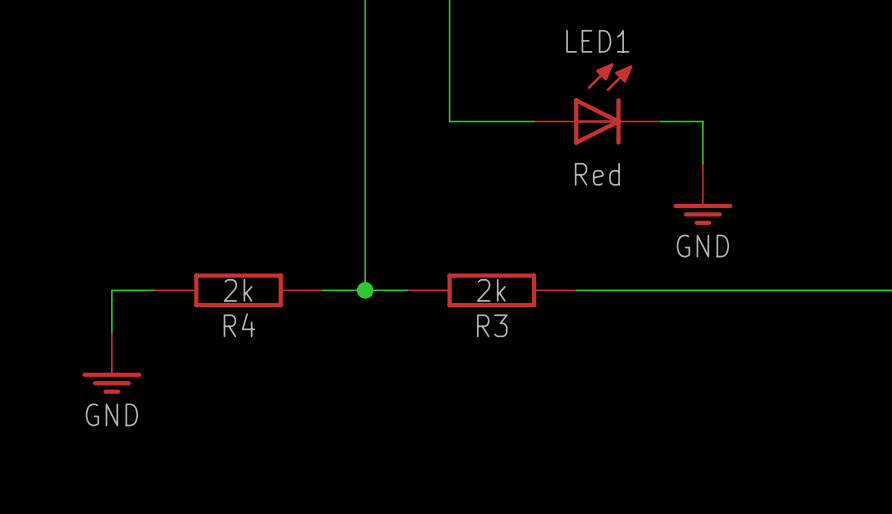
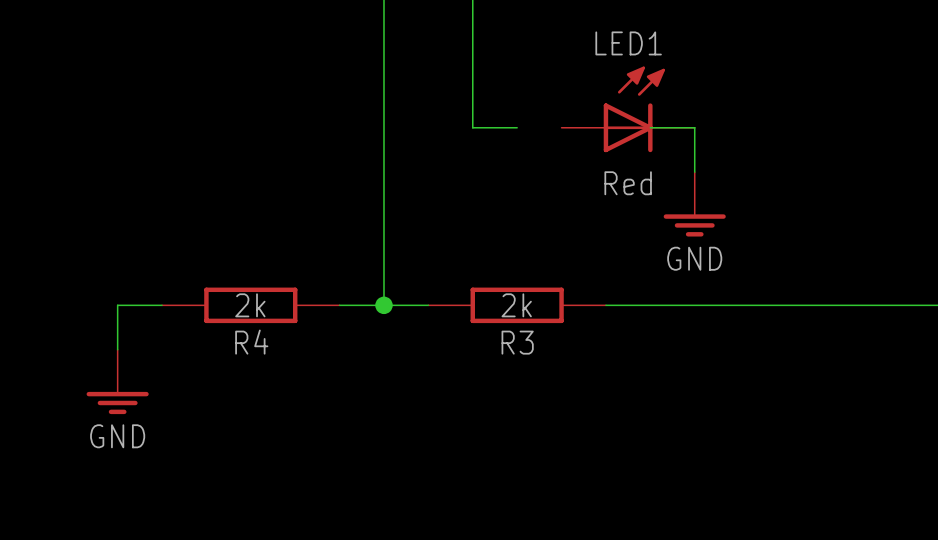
wire: (491, 121) (534, 121) -> none
wire: (660, 121) (702, 121) (702, 163) -> (650, 127) (694, 127) (694, 172)
power symbol position: GND (702, 194) -> GND (694, 204)

